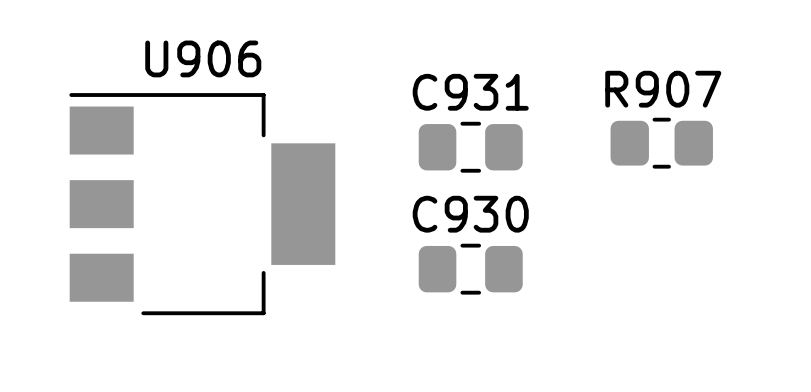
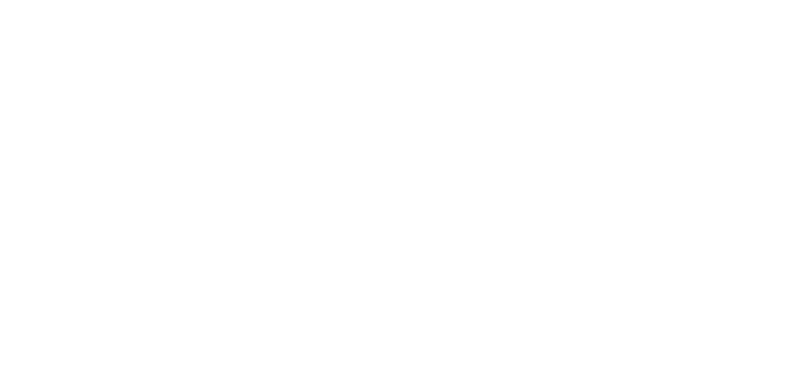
R907: (661, 143) -> none
C931: (470, 147) -> none
U906: (202, 204) -> none
C930: (470, 269) -> none

